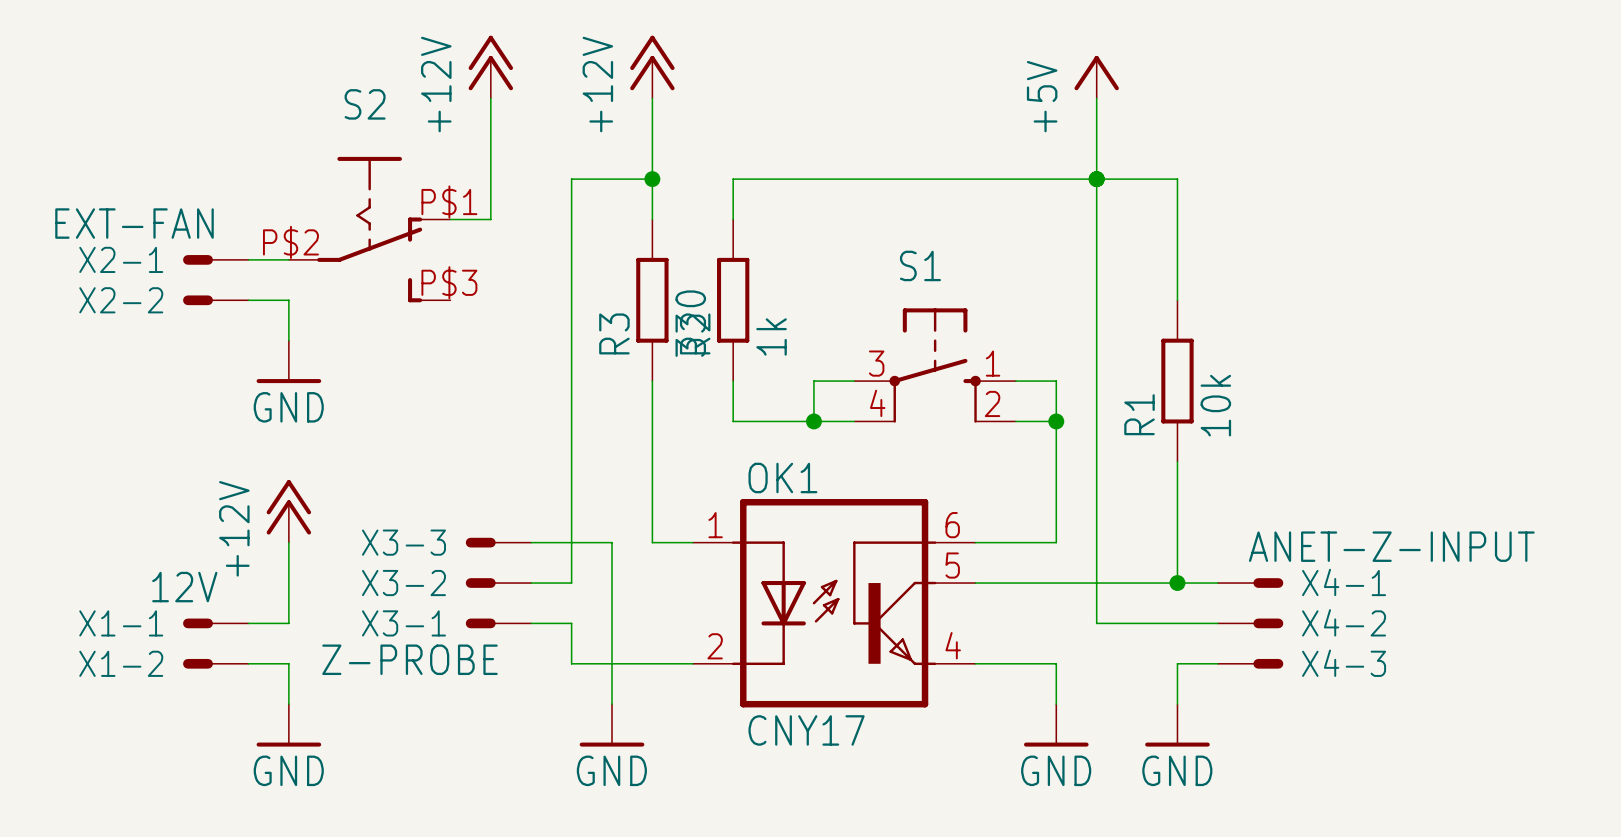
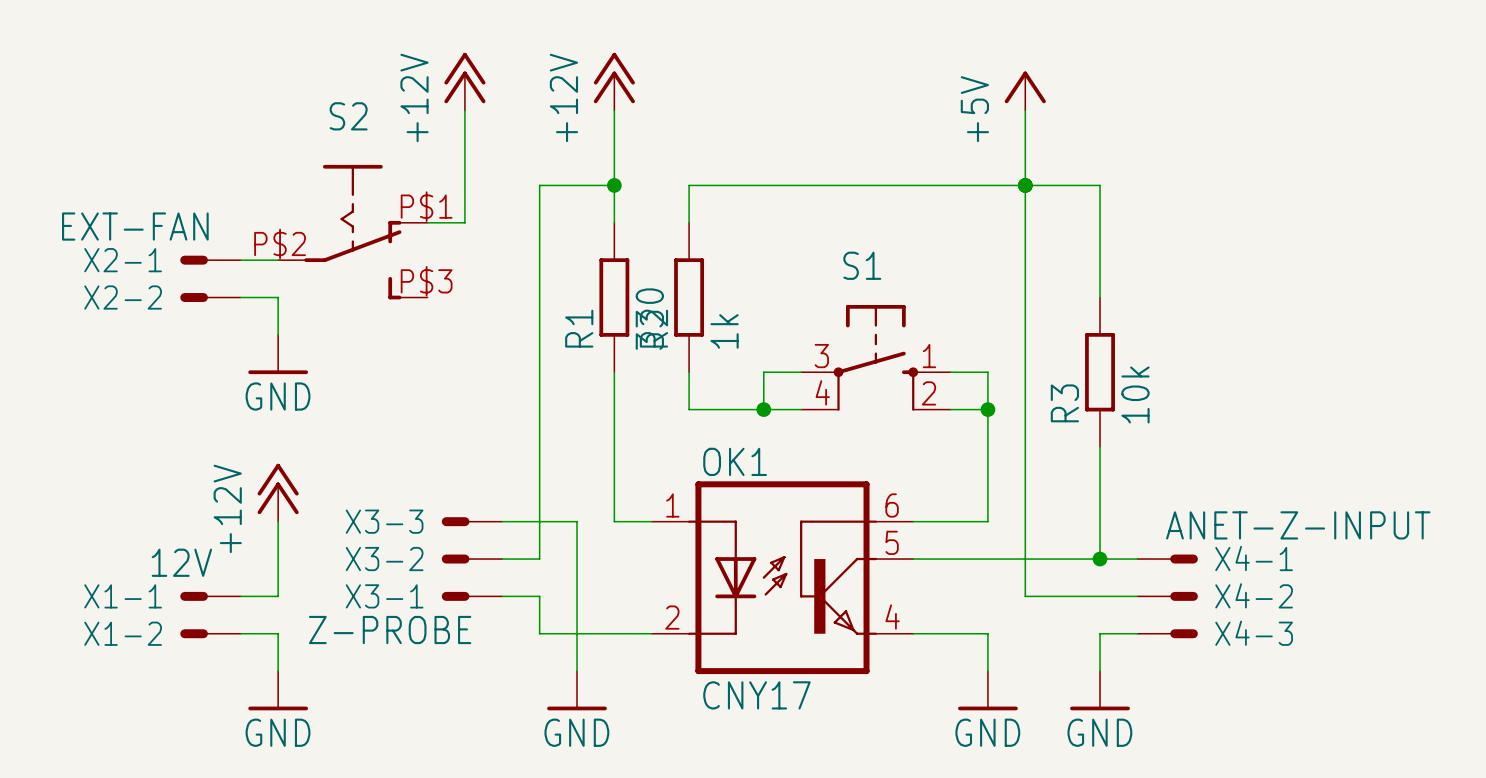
R3 name: R3 (614, 333) -> R1 (579, 328)
R1 name: R1 (1139, 414) -> R3 (1064, 403)

